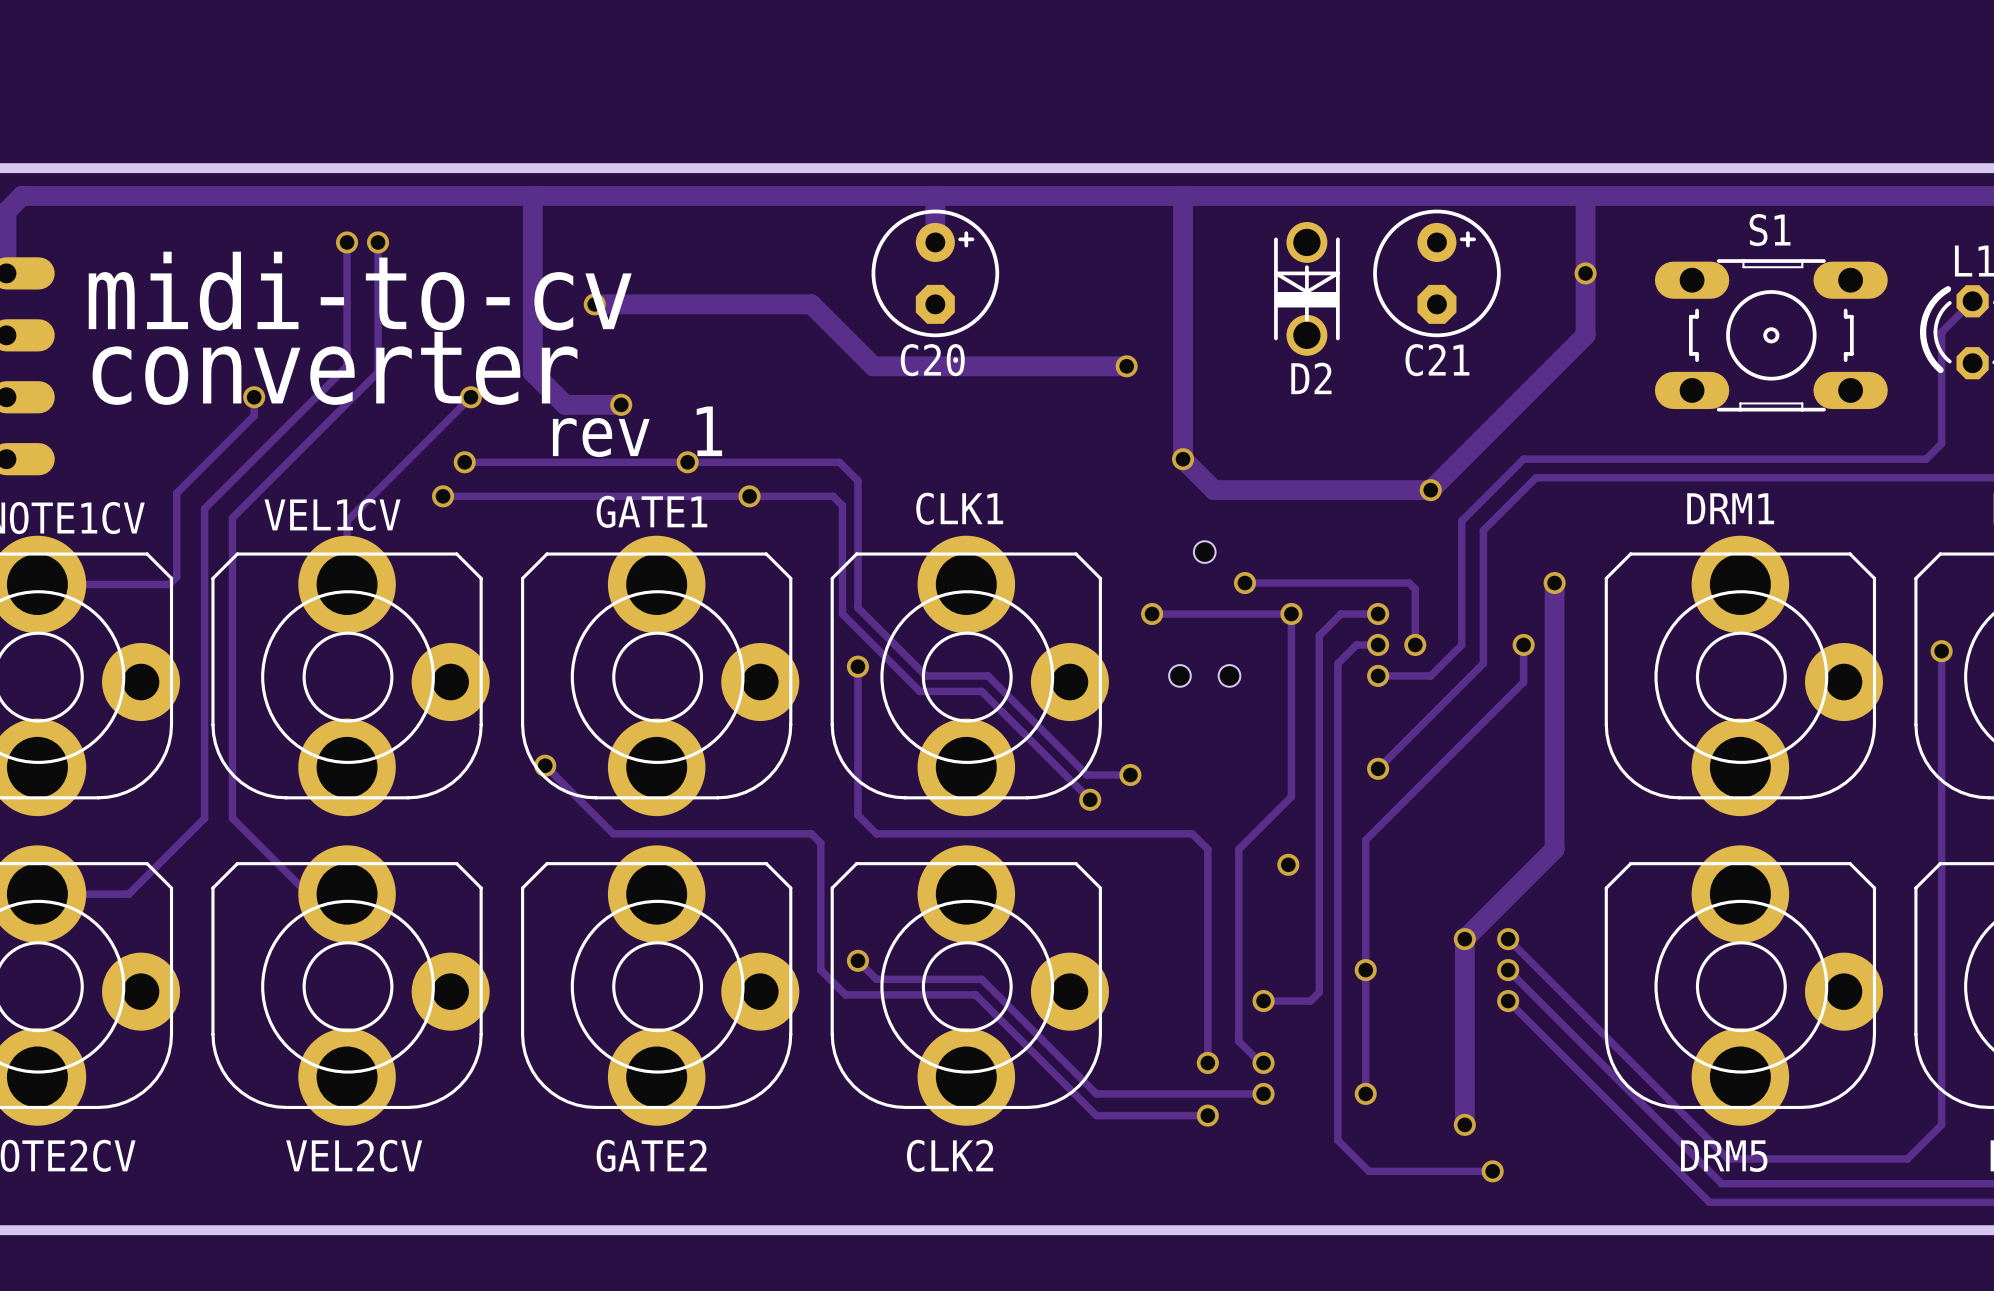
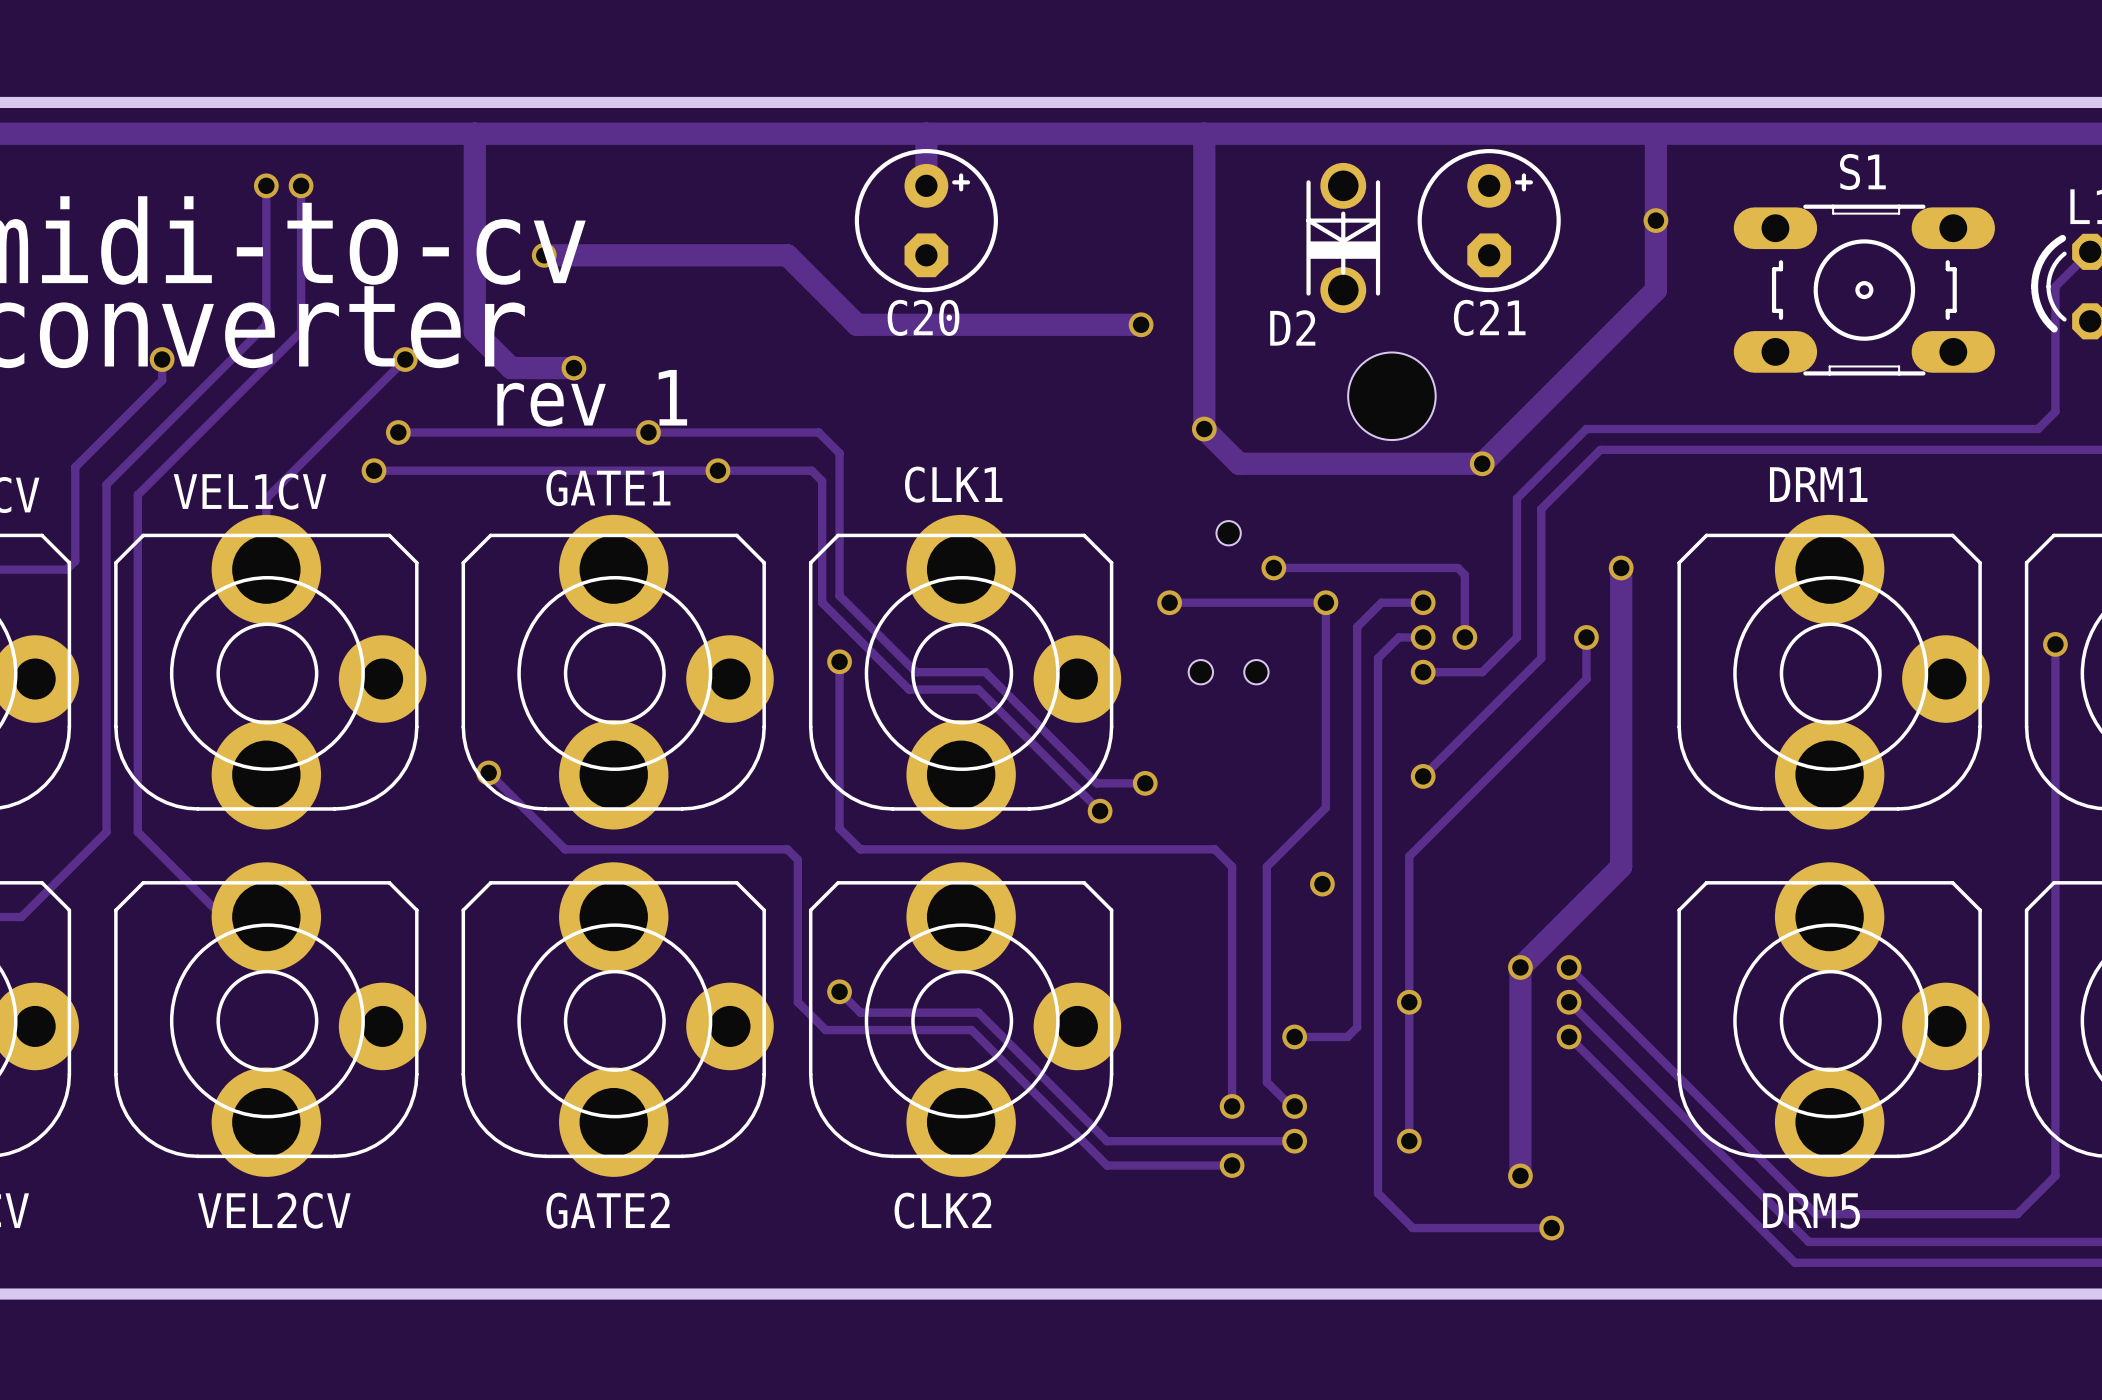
D2 name position: D2 (1311, 378) -> D2 (1292, 327)
hole: none -> (1391, 396)

